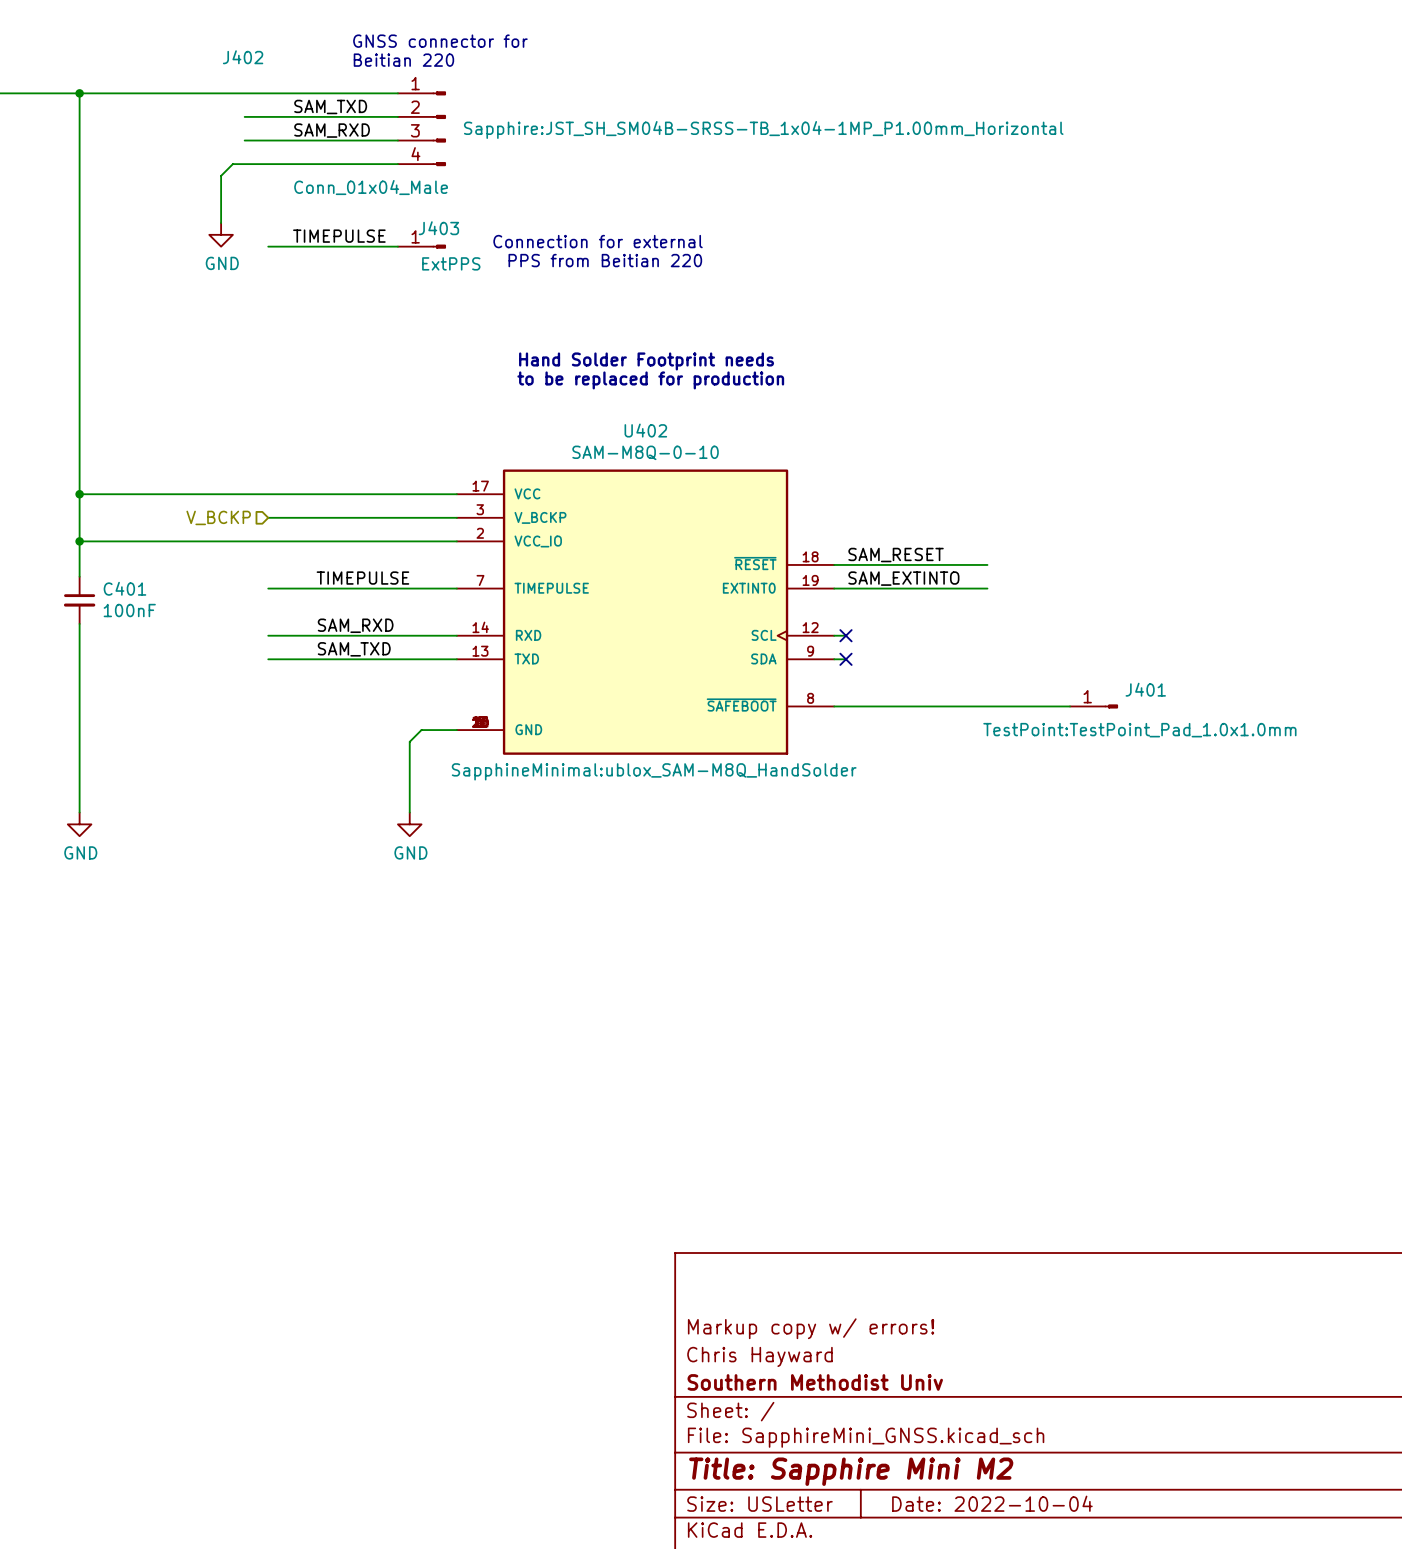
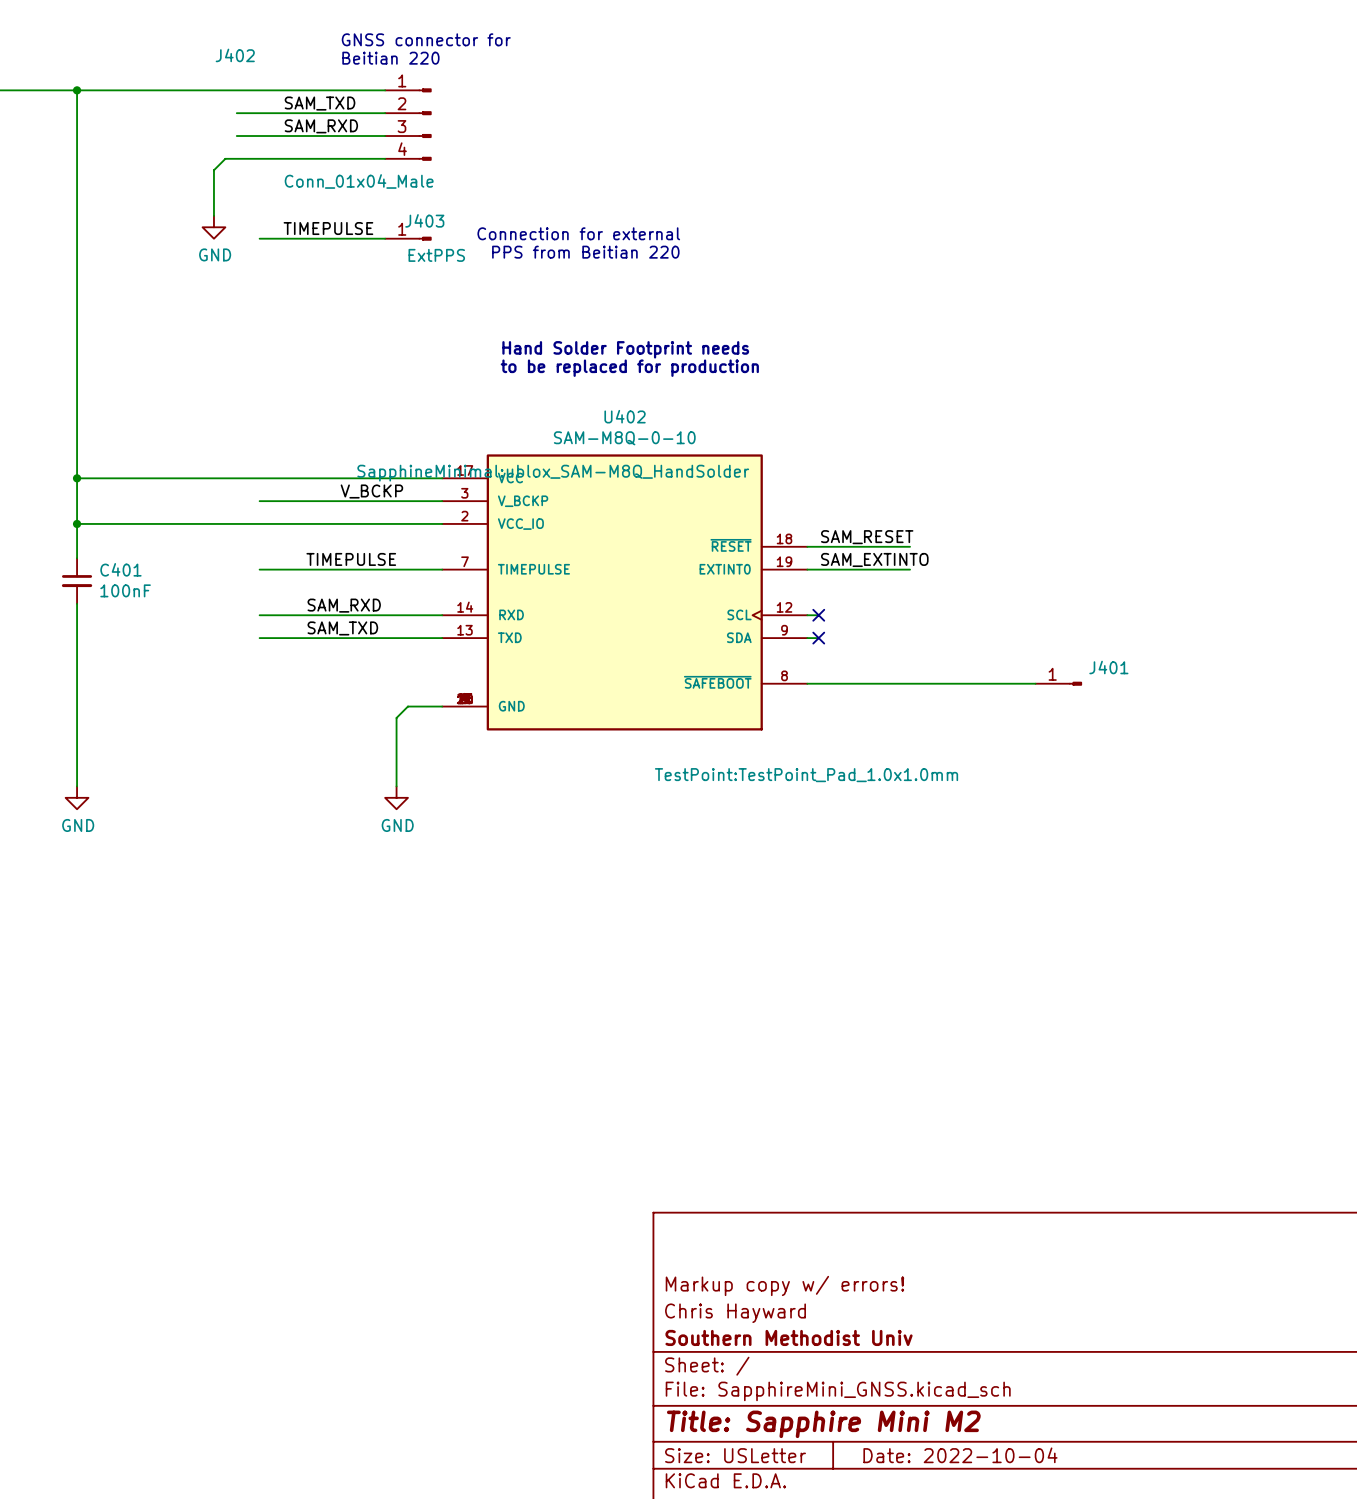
J402 text: Sapphire:JST_SH_SM04B-SRSS-TB_1x04-1MP_P1.00mm_Horizontal (763, 129) -> none
label: none -> V_BCKP (371, 491)
hierarchical label: V_BCKP (218, 517) -> none
wire: (940, 564) (987, 564) -> none
wire: (940, 588) (987, 588) -> none
J401 text position: TestPoint:TestPoint_Pad_1.0x1.0mm (1139, 730) -> TestPoint:TestPoint_Pad_1.0x1.0mm (806, 775)
U402 text position: SapphineMinimal:ublox_SAM-M8Q_HandSolder (654, 771) -> SapphineMinimal:ublox_SAM-M8Q_HandSolder (553, 473)

